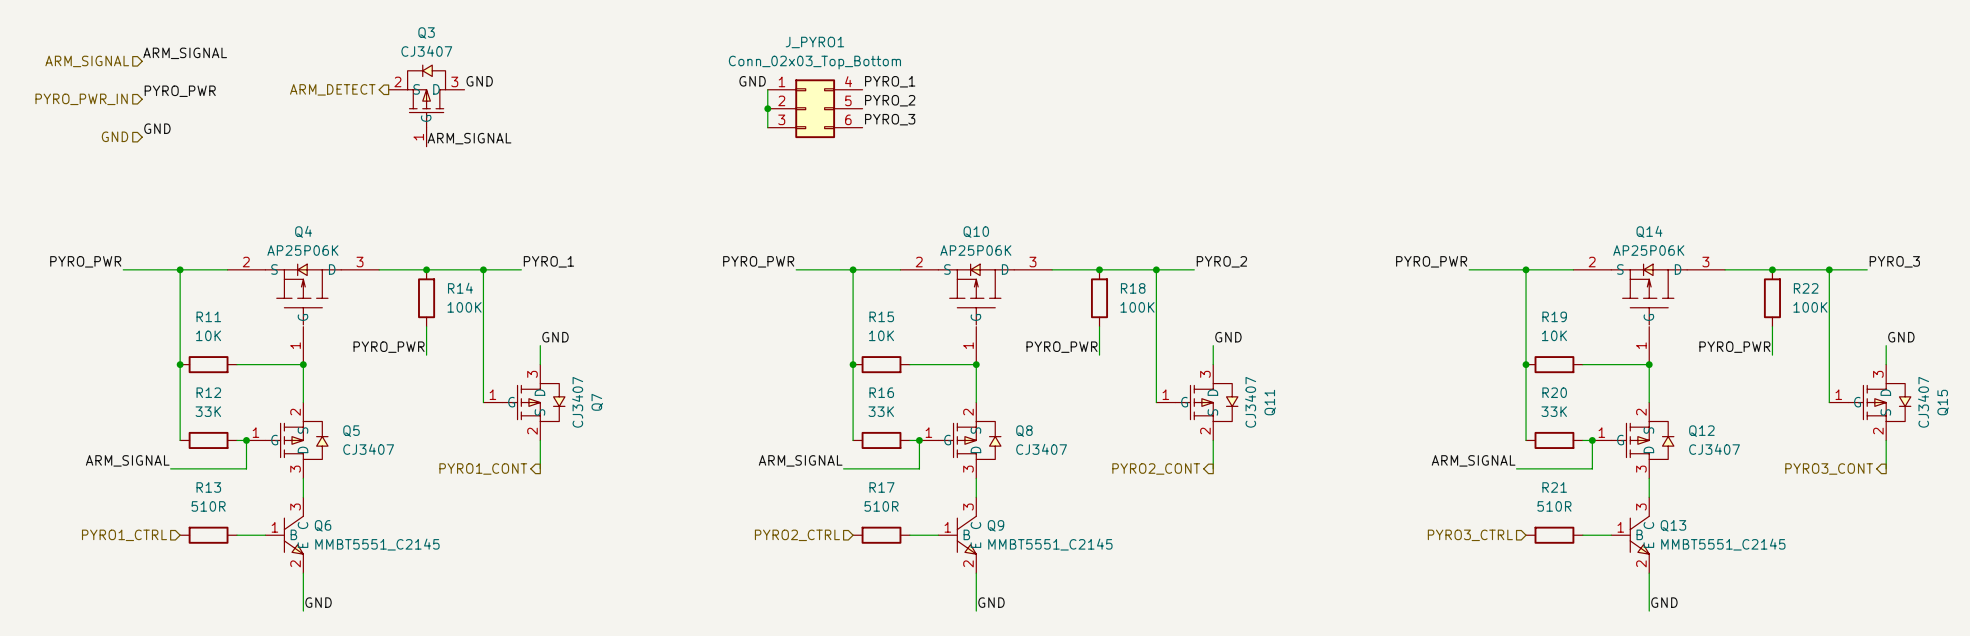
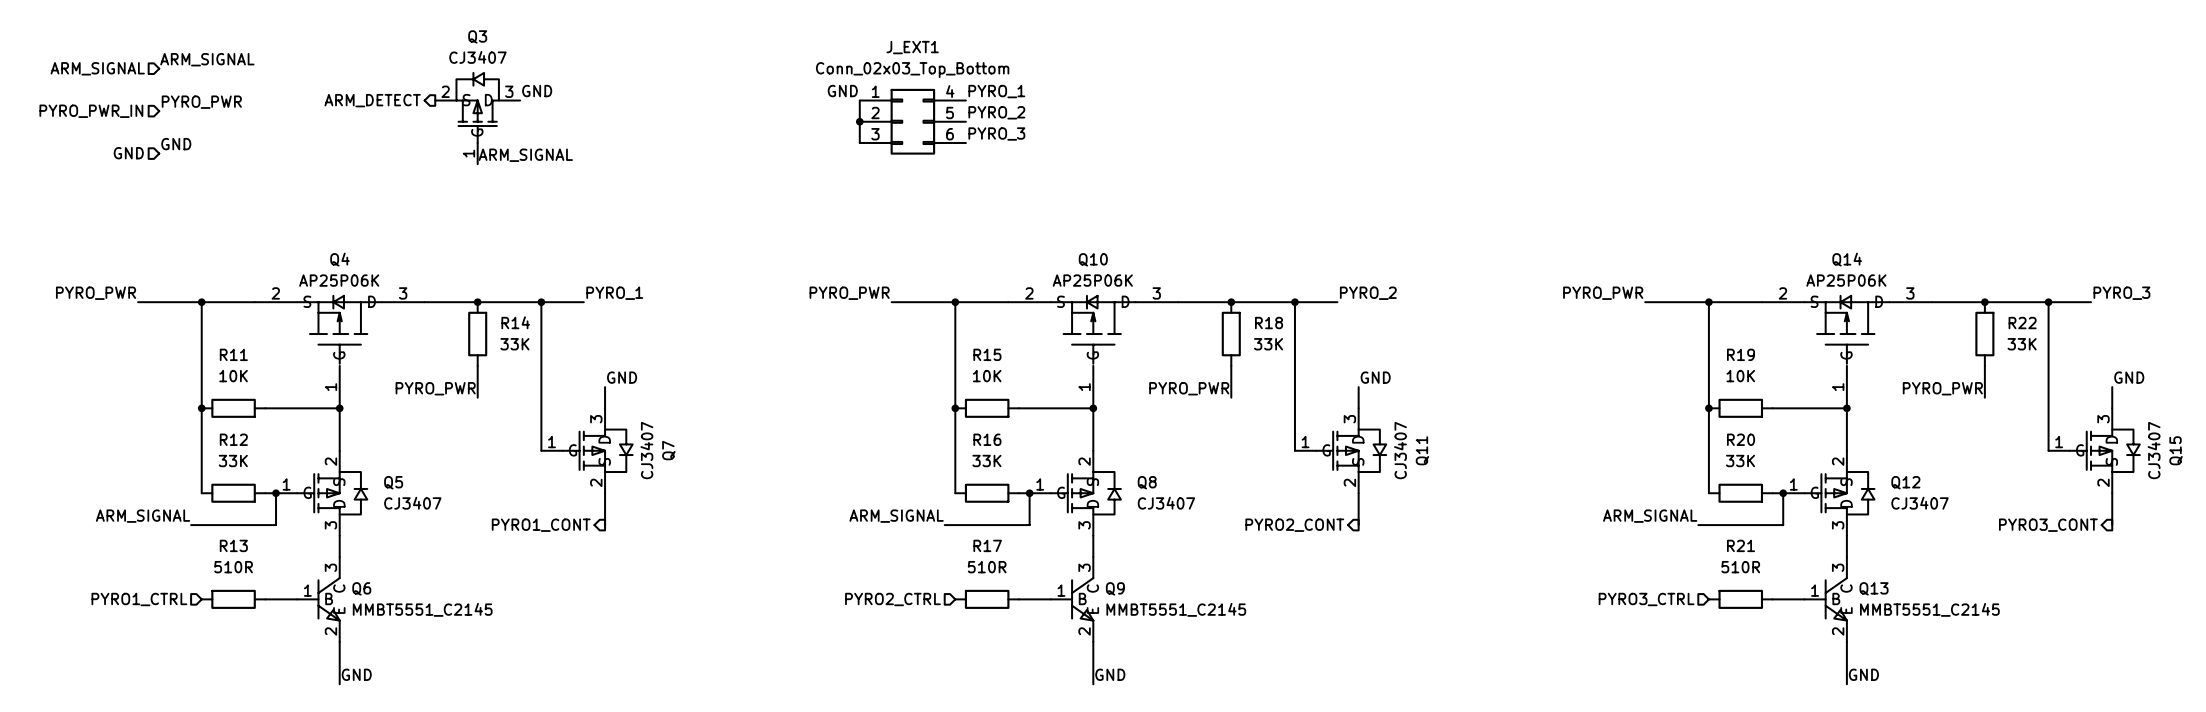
J_PYRO1 name: J_PYRO1 (814, 42) -> J_EXT1 (912, 47)
R14 value: 100K (464, 307) -> 33K (514, 344)
R18 value: 100K (1137, 307) -> 33K (1268, 344)
R22 value: 100K (1810, 307) -> 33K (2022, 344)

